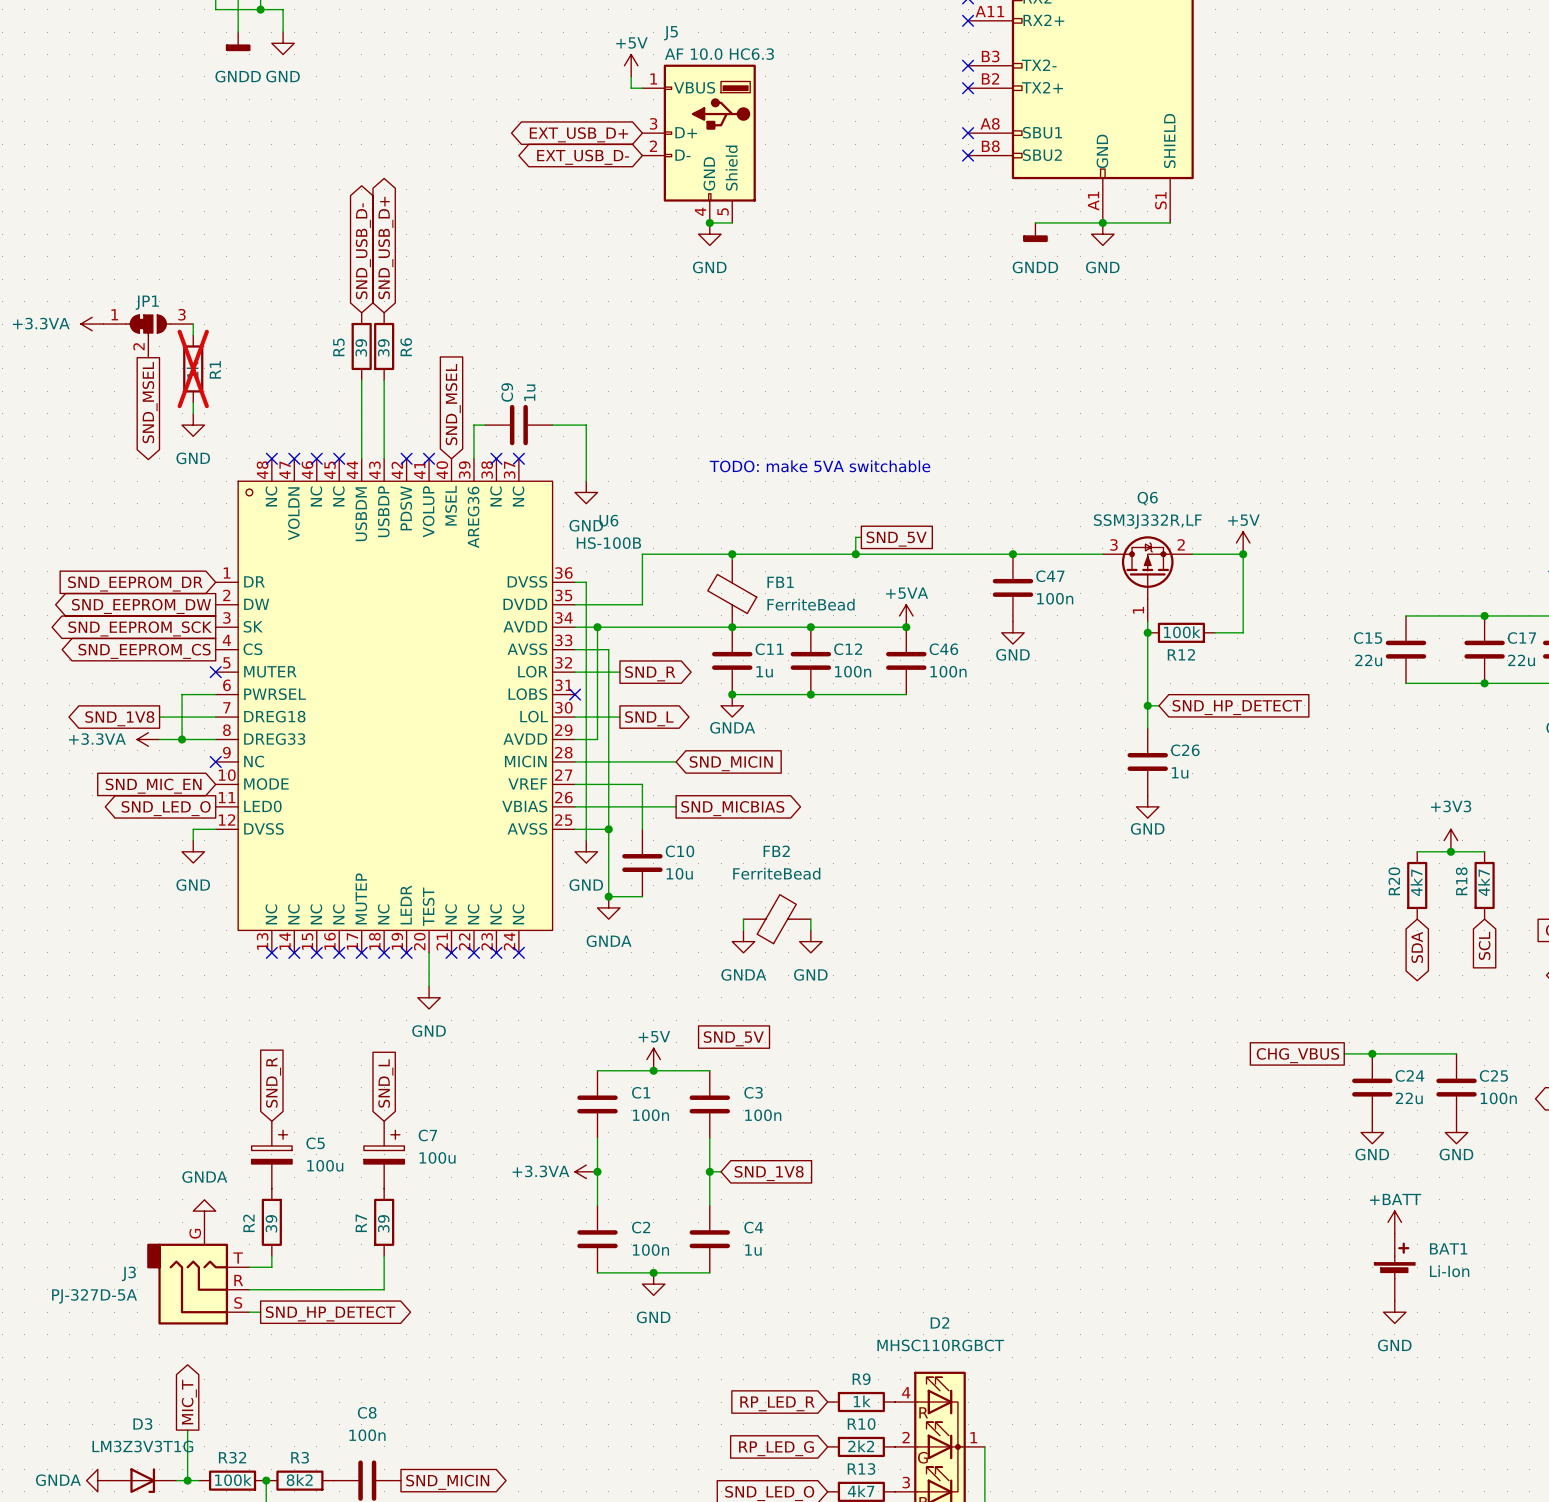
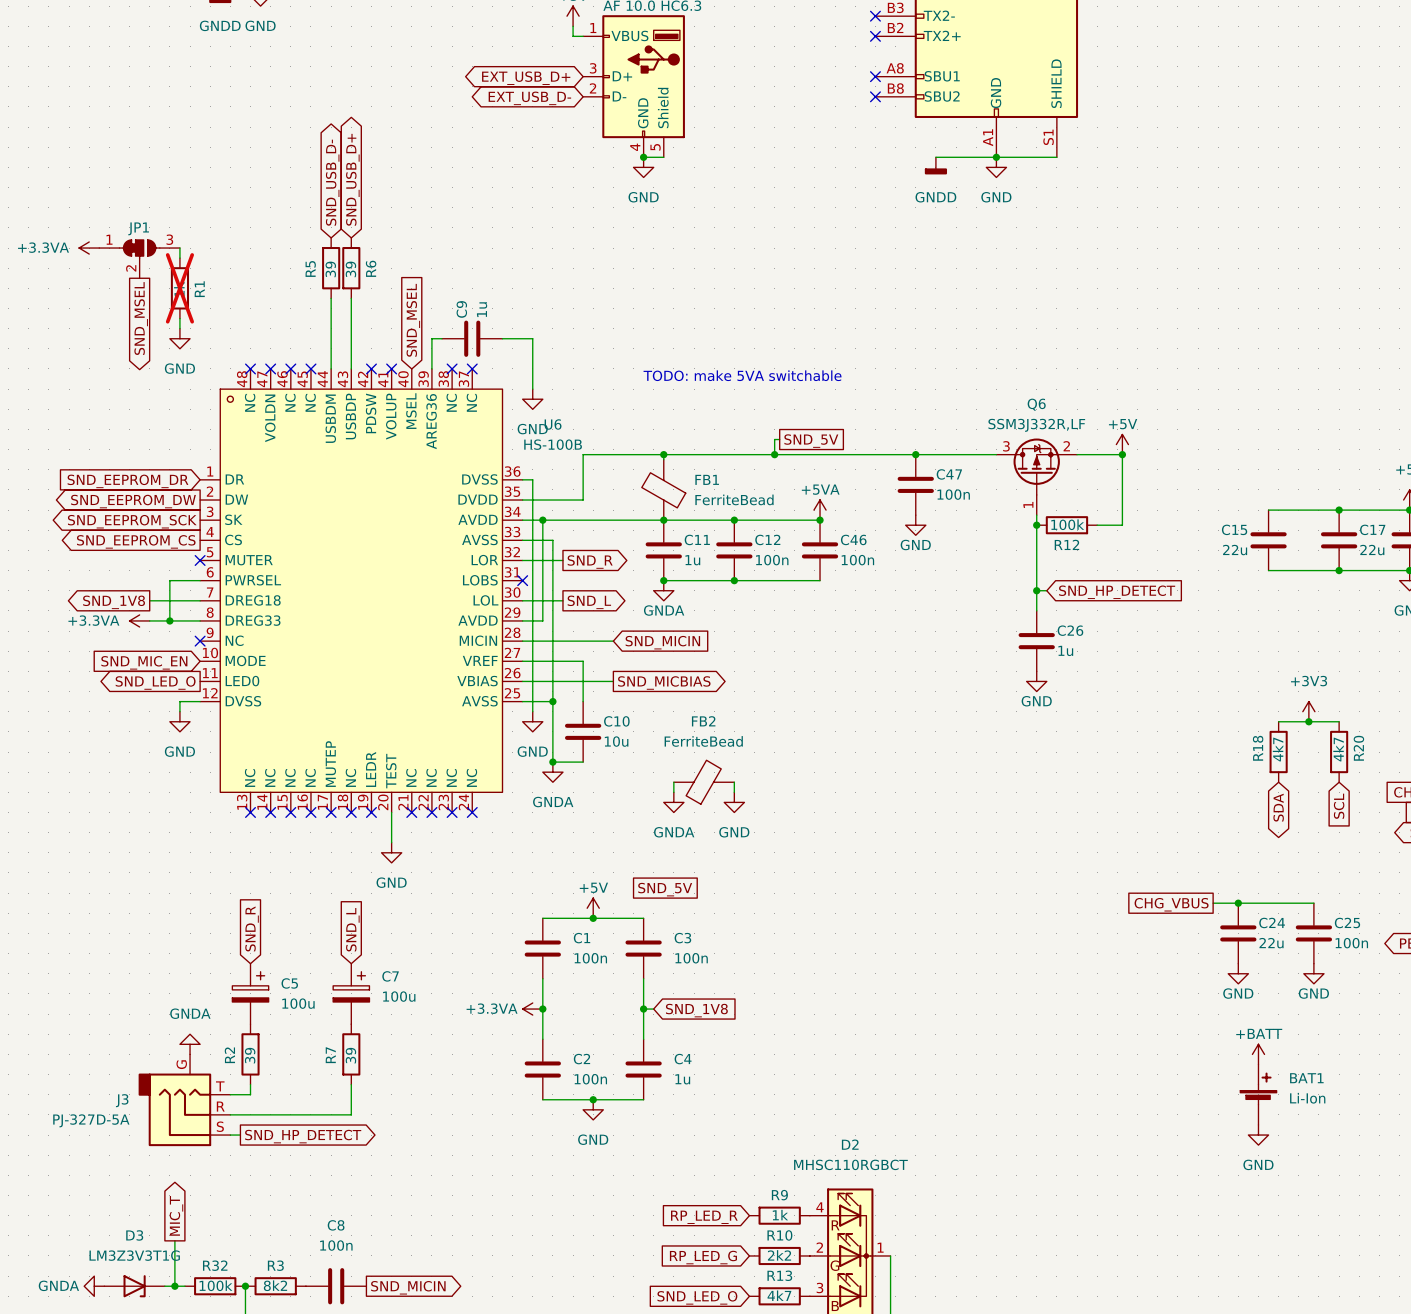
R20 name: R20 (1394, 881) -> R18 (1258, 748)
R18 name: R18 (1461, 881) -> R20 (1358, 748)

